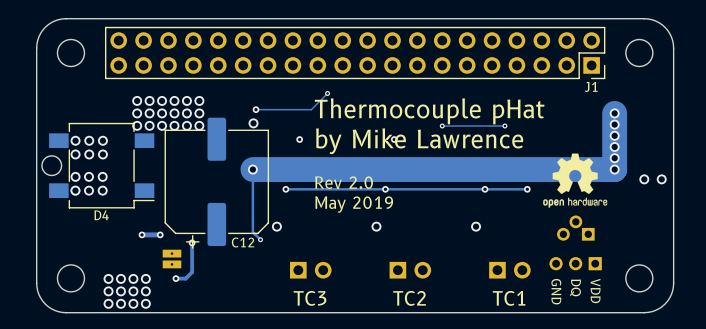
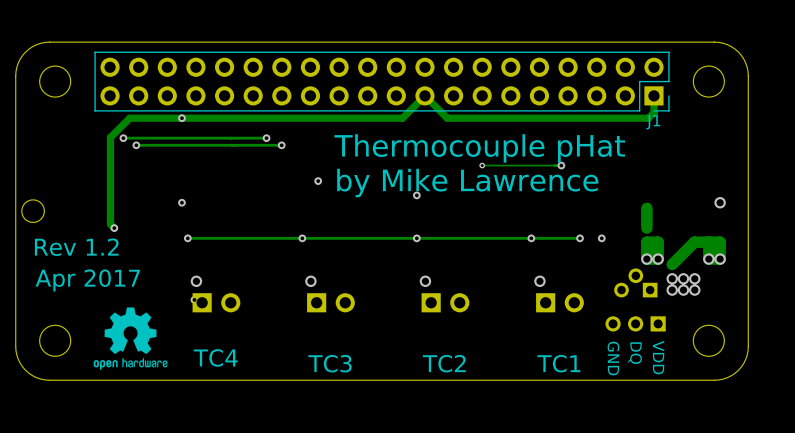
track: none -> (653, 95) (653, 112) (648, 118) (447, 118) (424, 95) (402, 118) (129, 118) (110, 137) (110, 224) (114, 228)
via: none -> (181, 118)
track: (327, 93) (311, 109) (256, 109) -> none
via: (327, 93) -> none
via: (137, 100) -> none
via: (149, 100) -> none
via: (162, 100) -> none
via: (174, 100) -> none
via: (186, 100) -> none
via: (199, 100) -> none
via: none -> (123, 138)
track: none -> (266, 138) (123, 138)
via: none -> (266, 138)
via: none -> (136, 145)
track: none -> (281, 145) (136, 145)
via: none -> (281, 145)
via: (256, 109) -> none
via: (137, 113) -> none
via: (149, 113) -> none
via: (162, 113) -> none
via: (174, 113) -> none
via: (186, 113) -> none
via: (199, 113) -> none
track: (614, 113) (614, 169) (252, 169) (252, 232) (260, 239) -> none
via: (614, 113) -> none
via: (253, 123) -> none
via: (614, 124) -> none
via: (137, 125) -> none
via: (149, 125) -> none
via: (162, 125) -> none
via: (174, 125) -> none
via: (186, 125) -> none
via: (199, 125) -> none
via: (504, 126) -> none
track: none -> (561, 165) (554, 165)
via: none -> (561, 165)
via: (614, 135) -> none
via position: (394, 139) -> (416, 195)
via: (75, 140) -> none
via: (89, 140) -> none
via: (102, 140) -> none
via: (614, 147) -> none
drawing: [543, 153, 608, 208] -> none
via: (75, 154) -> none
via: (89, 154) -> none
via: (102, 154) -> none
via: none -> (181, 202)
via: (614, 158) -> none
via: none -> (720, 202)
track: none -> (646, 208) (646, 228)
D4: (101, 165) -> none
via: (252, 169) -> none
via: (614, 169) -> none
via: (75, 176) -> none
via: (89, 176) -> none
via: (102, 176) -> none
via: (644, 179) -> none
via: (661, 179) -> none
via: none -> (114, 228)
text: Rev 2.0 (344, 182) -> none
C12: (216, 183) -> none
via: none -> (187, 238)
track: none -> (302, 238) (187, 238)
via: none -> (601, 238)
via: (75, 190) -> none
via: (89, 190) -> none
via: (102, 190) -> none
track: none -> (658, 242) (646, 242) (646, 259) (658, 259) (658, 242)
track: none -> (708, 242) (708, 259) (720, 259) (720, 242) (694, 242) (672, 264)
text: none -> Rev 1.2 (76, 247)
text: May 2019 (354, 204) -> none
via: none -> (646, 259)
via: none -> (658, 259)
via: none -> (708, 259)
via: none -> (720, 259)
via: none -> (672, 278)
via: none -> (683, 278)
via: none -> (694, 278)
text: none -> Apr 2017 (87, 280)
via: none -> (196, 281)
via position: (276, 226) -> (310, 281)
via position: (376, 226) -> (425, 281)
via position: (476, 226) -> (539, 281)
via: (142, 234) -> none
track: (160, 234) (142, 234) -> none
via: (160, 234) -> none
via: none -> (672, 290)
via: none -> (683, 290)
via: none -> (694, 290)
via: (260, 239) -> none
track: (192, 242) (192, 272) (185, 278) (175, 278) -> none
part: none -> (216, 302)
drawing: none -> [93, 307, 168, 370]
part: (172, 259) -> none
part position: (310, 270) -> (330, 302)
part position: (410, 270) -> (445, 302)
part position: (509, 270) -> (559, 302)
via: (108, 278) -> none
via: (120, 278) -> none
via: (133, 278) -> none
via: (145, 278) -> none
via: (175, 278) -> none
via: (108, 291) -> none
via: (120, 291) -> none
via: (133, 291) -> none
via: (145, 291) -> none
text: none -> TC4 (215, 357)
via: (108, 303) -> none
via: (120, 303) -> none
via: (133, 303) -> none
via: (145, 303) -> none

